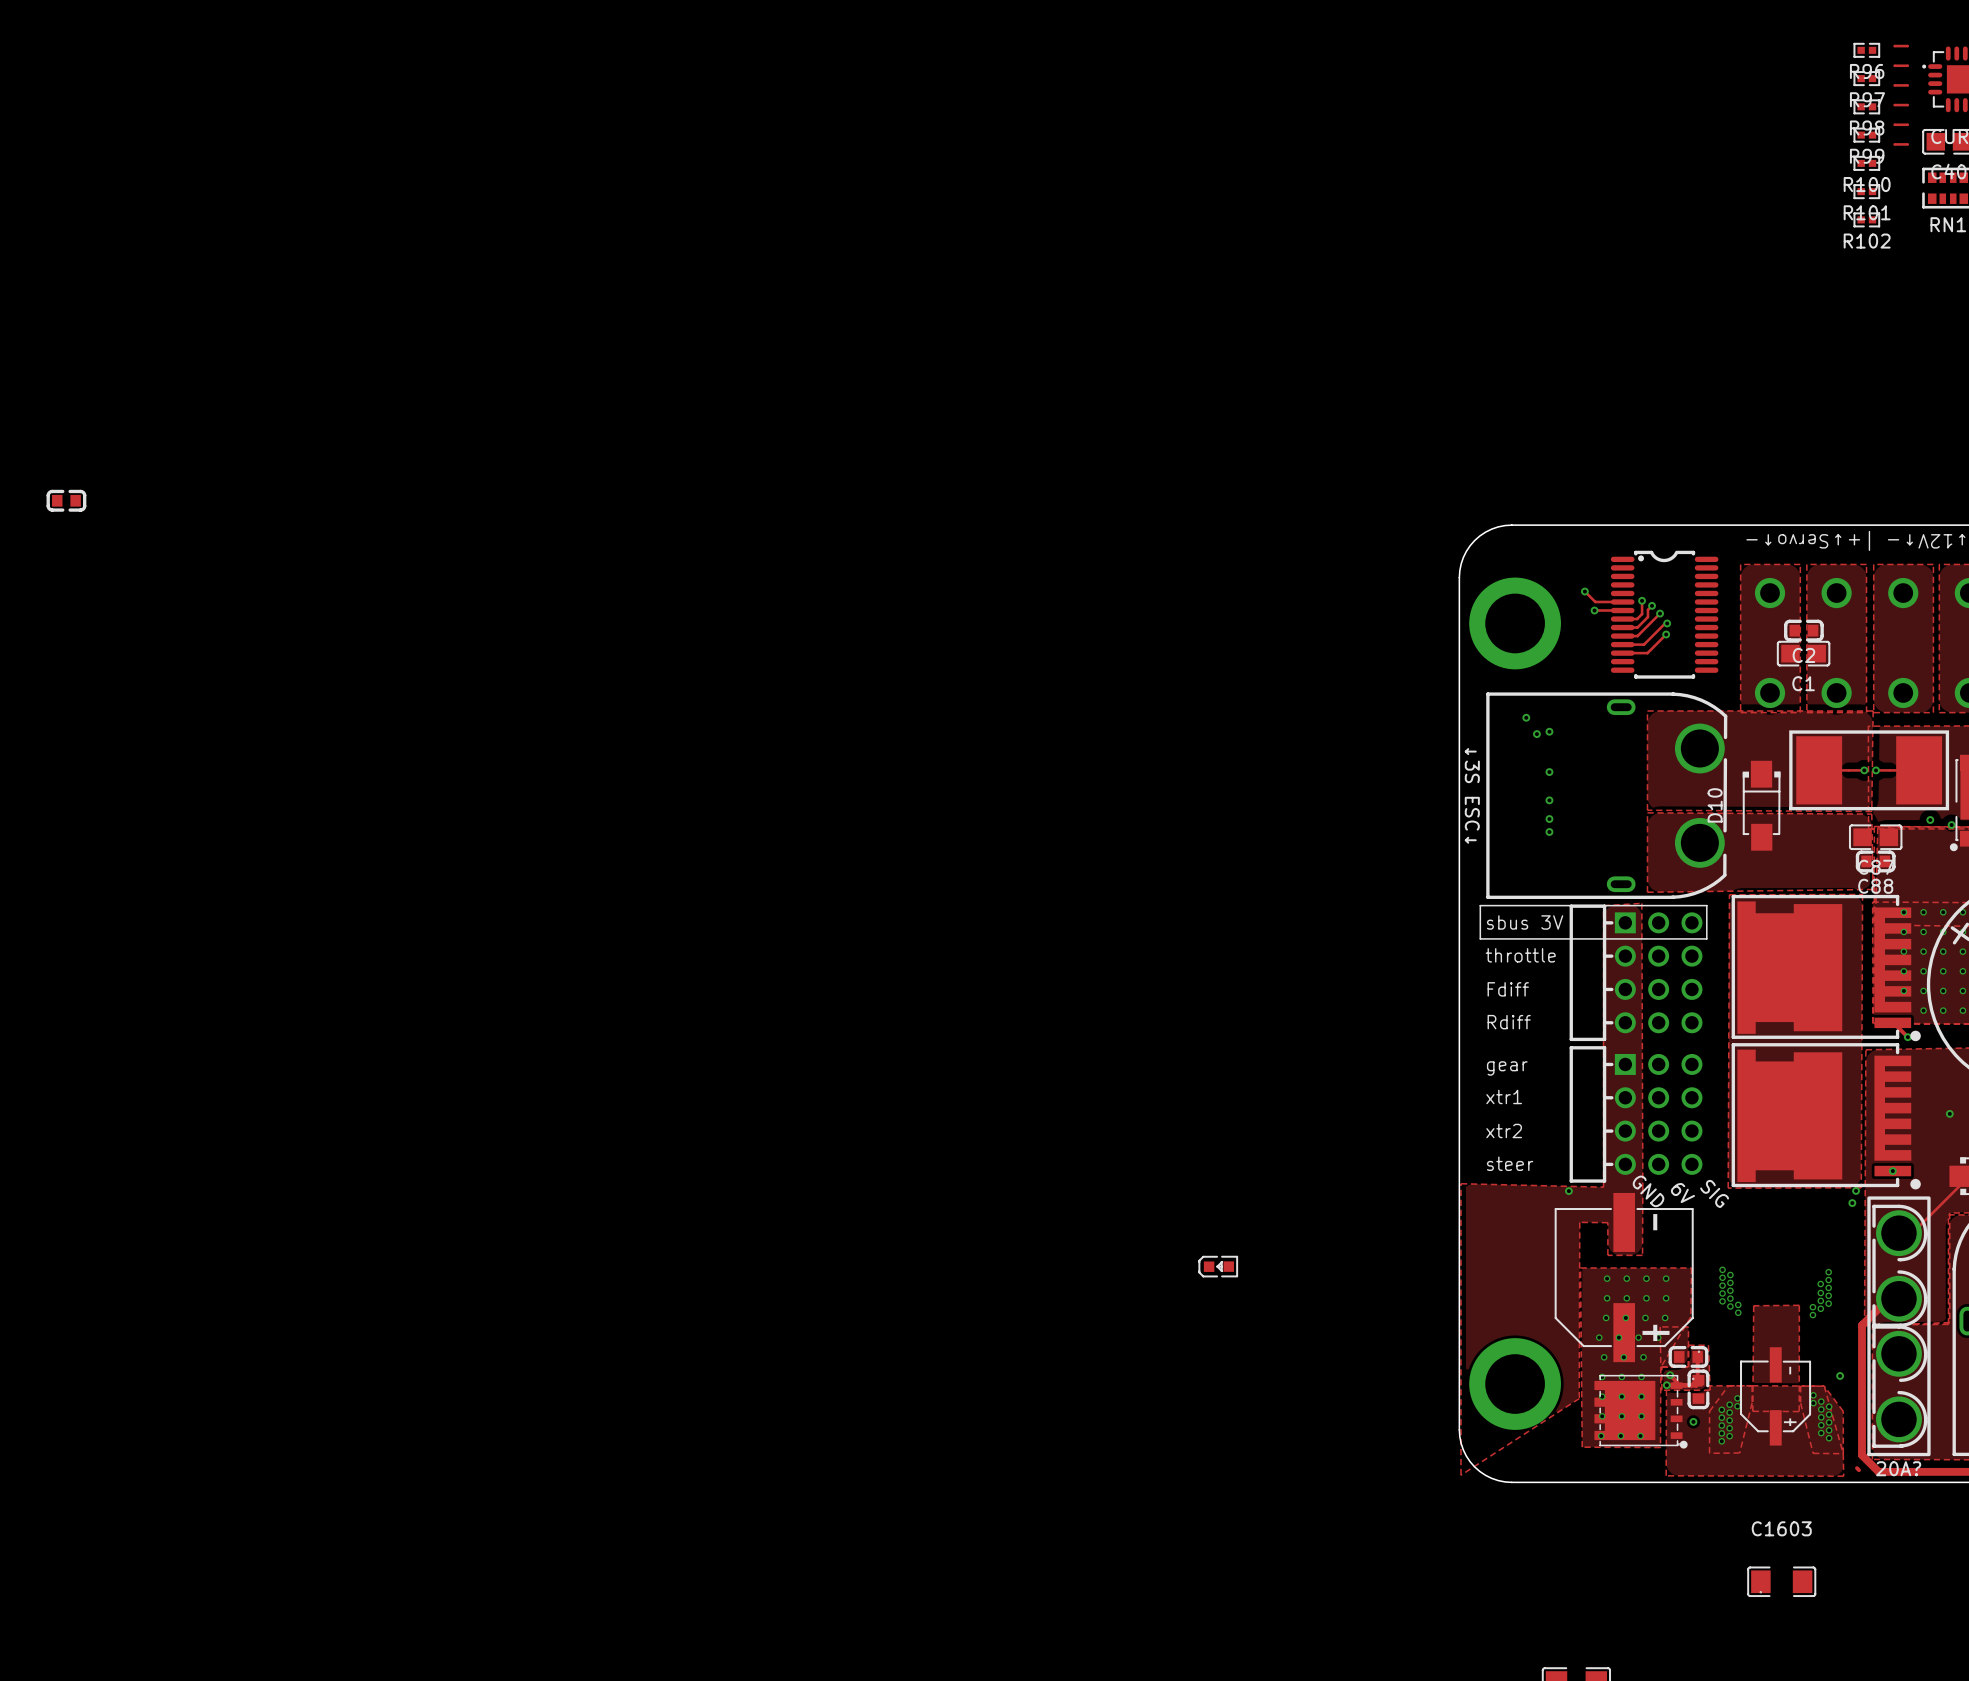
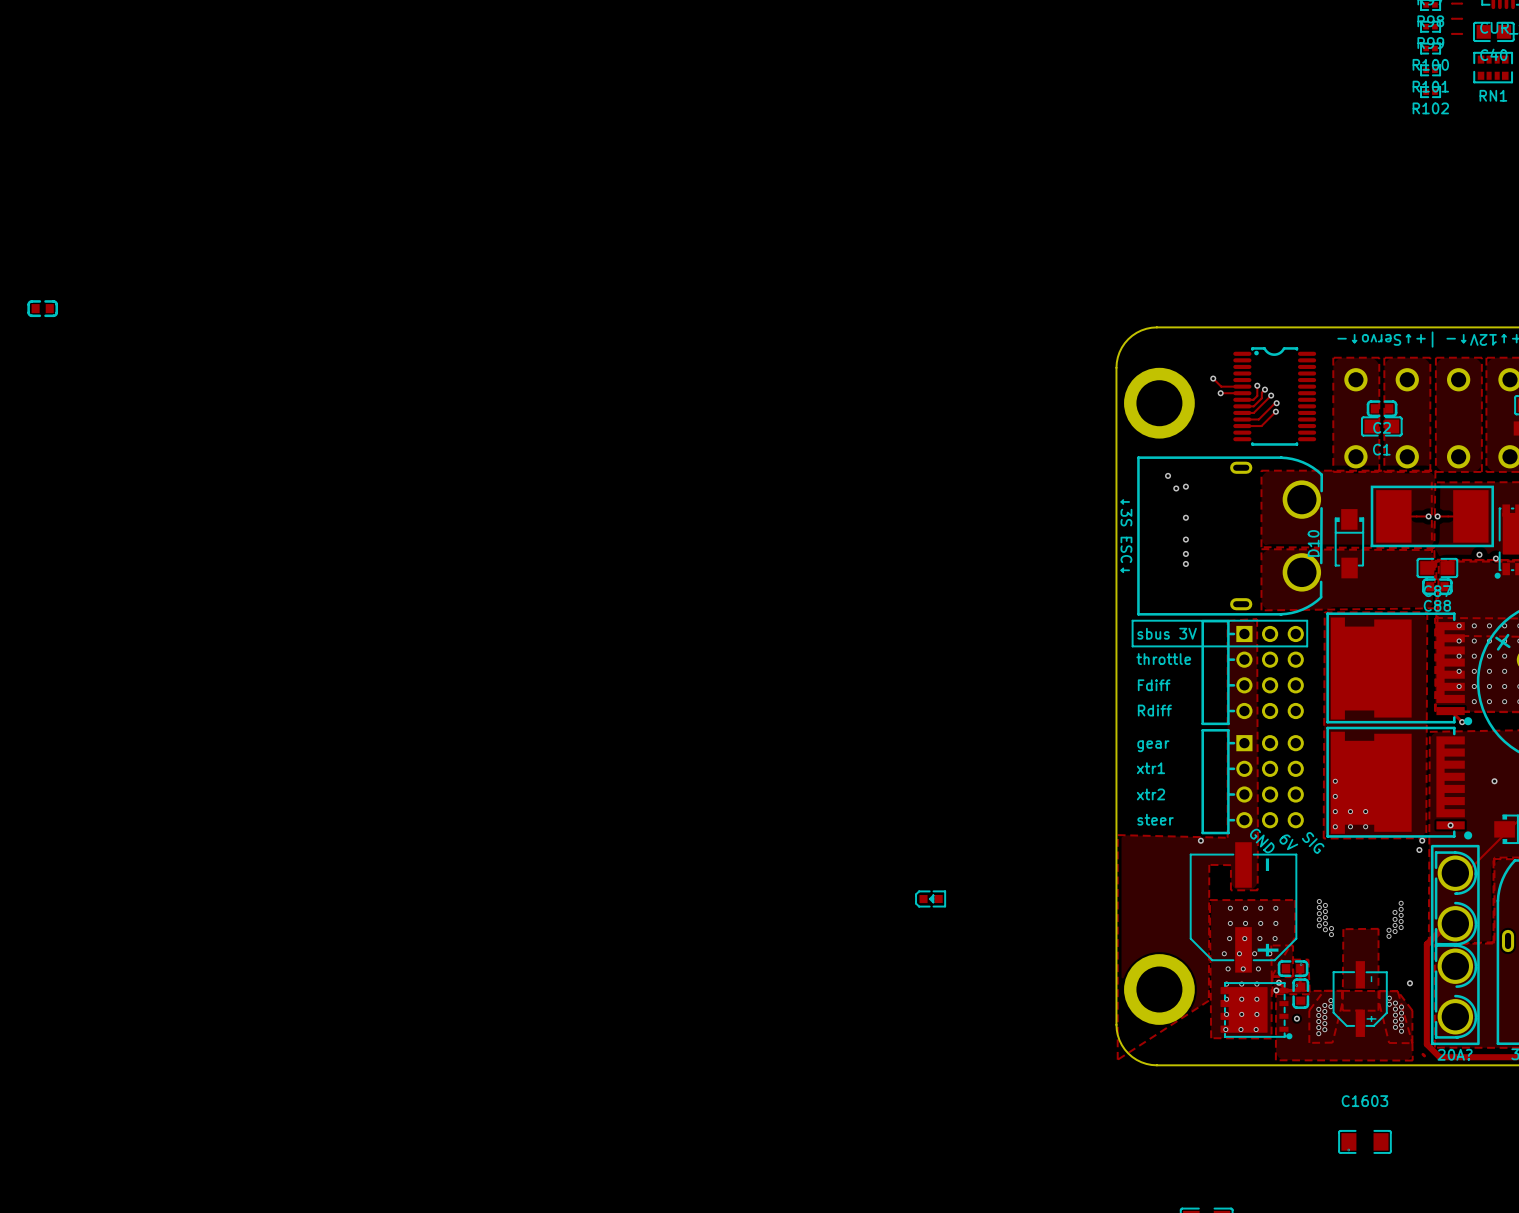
via: none -> (1335, 781)
via: none -> (1335, 796)
via: none -> (1335, 811)
via: none -> (1350, 811)
via: none -> (1365, 811)
via: none -> (1335, 826)
via: none -> (1350, 826)
via: none -> (1365, 826)

